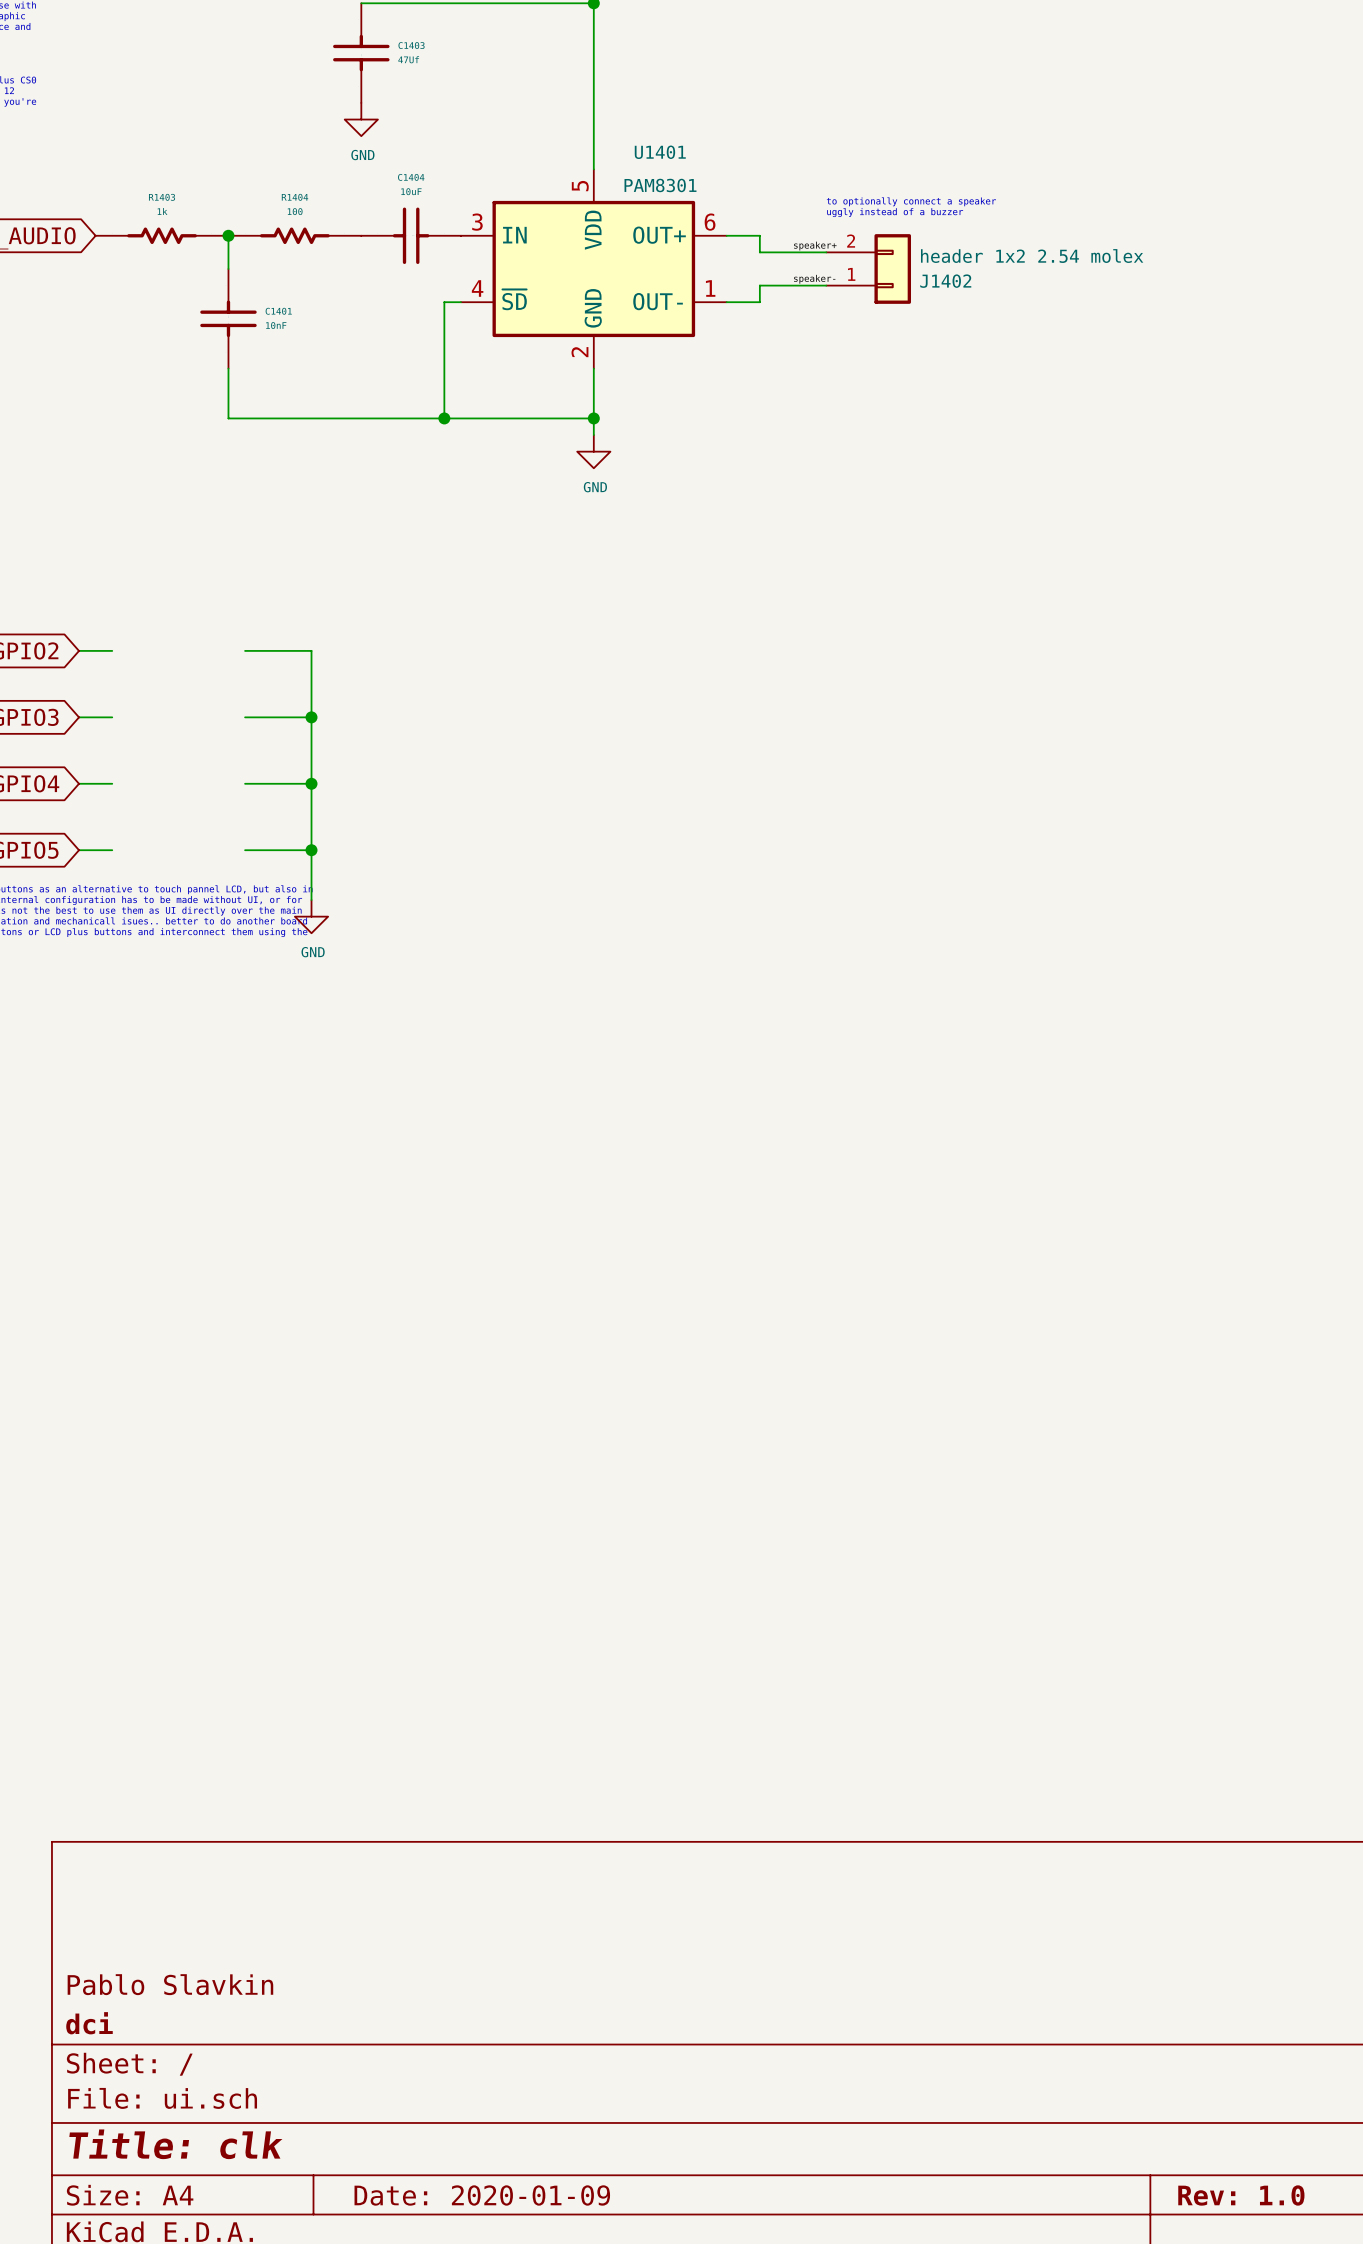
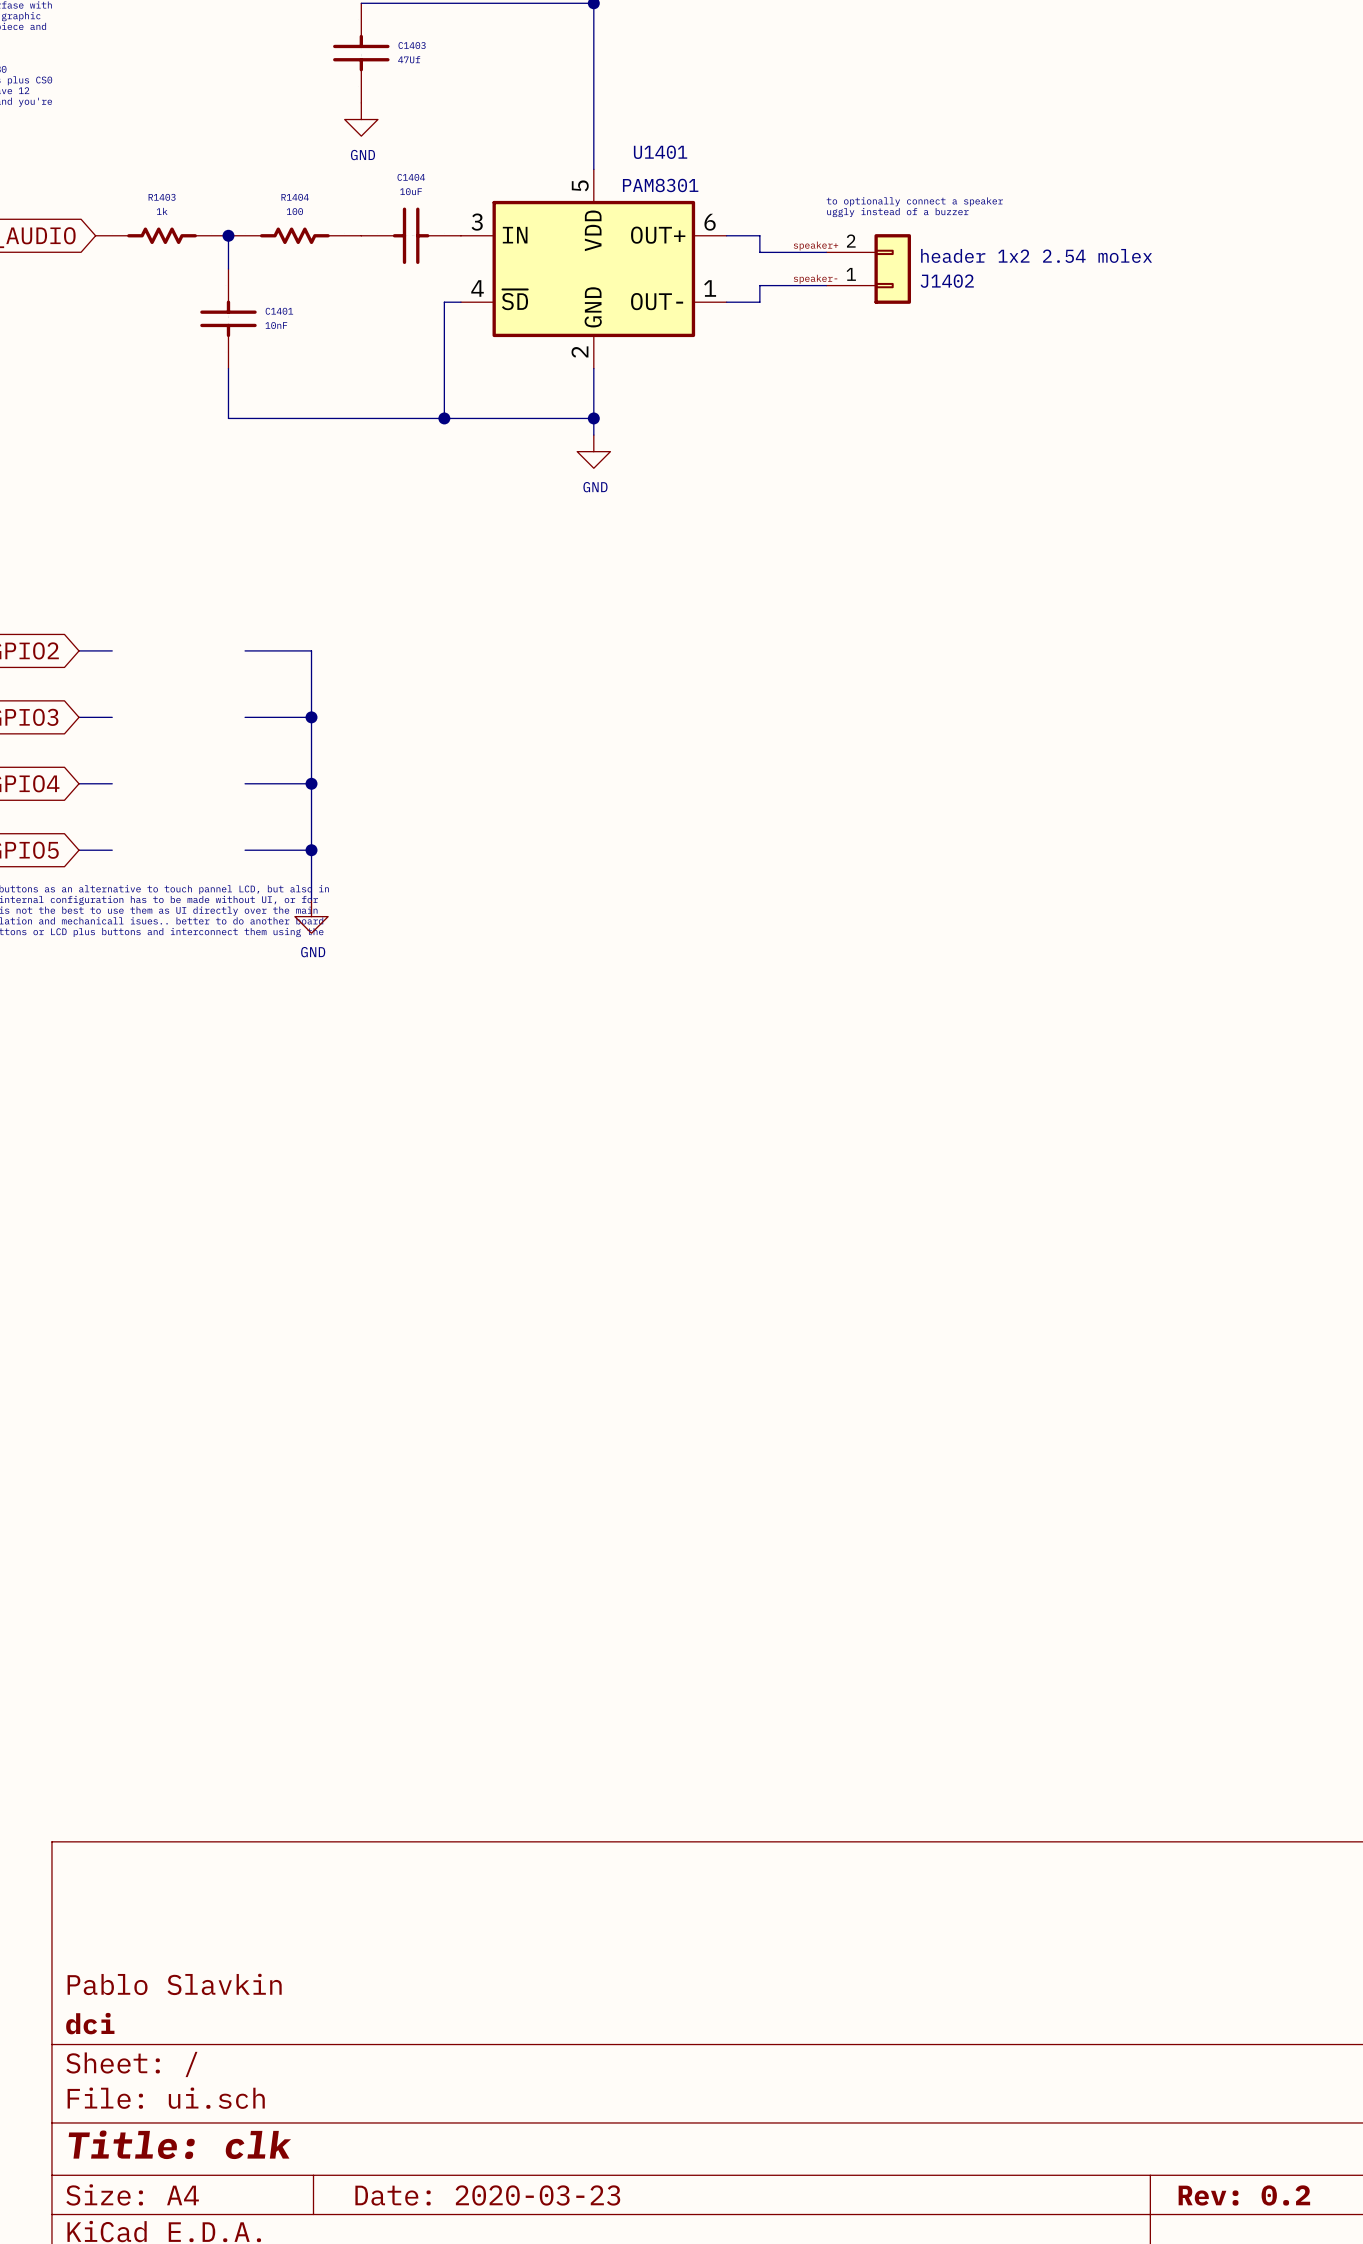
title block: Date: 2020-01-09 (482, 2195) -> Date: 2020-03-23 (487, 2195)
title block: Rev: 1.0 (1241, 2195) -> Rev: 0.2 (1244, 2195)

